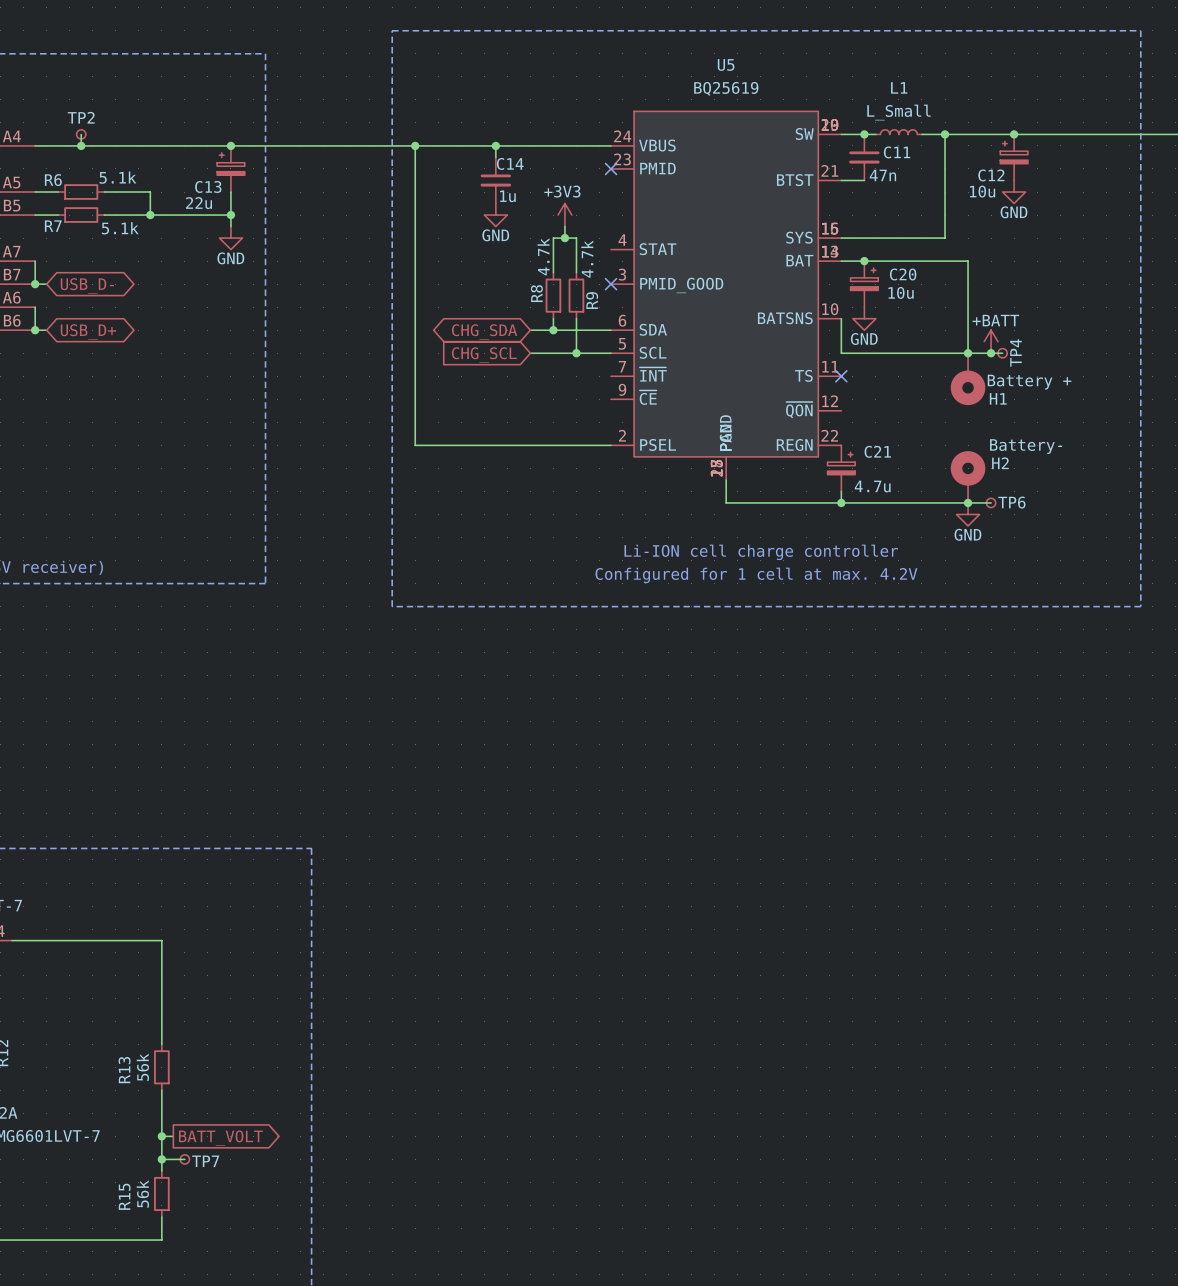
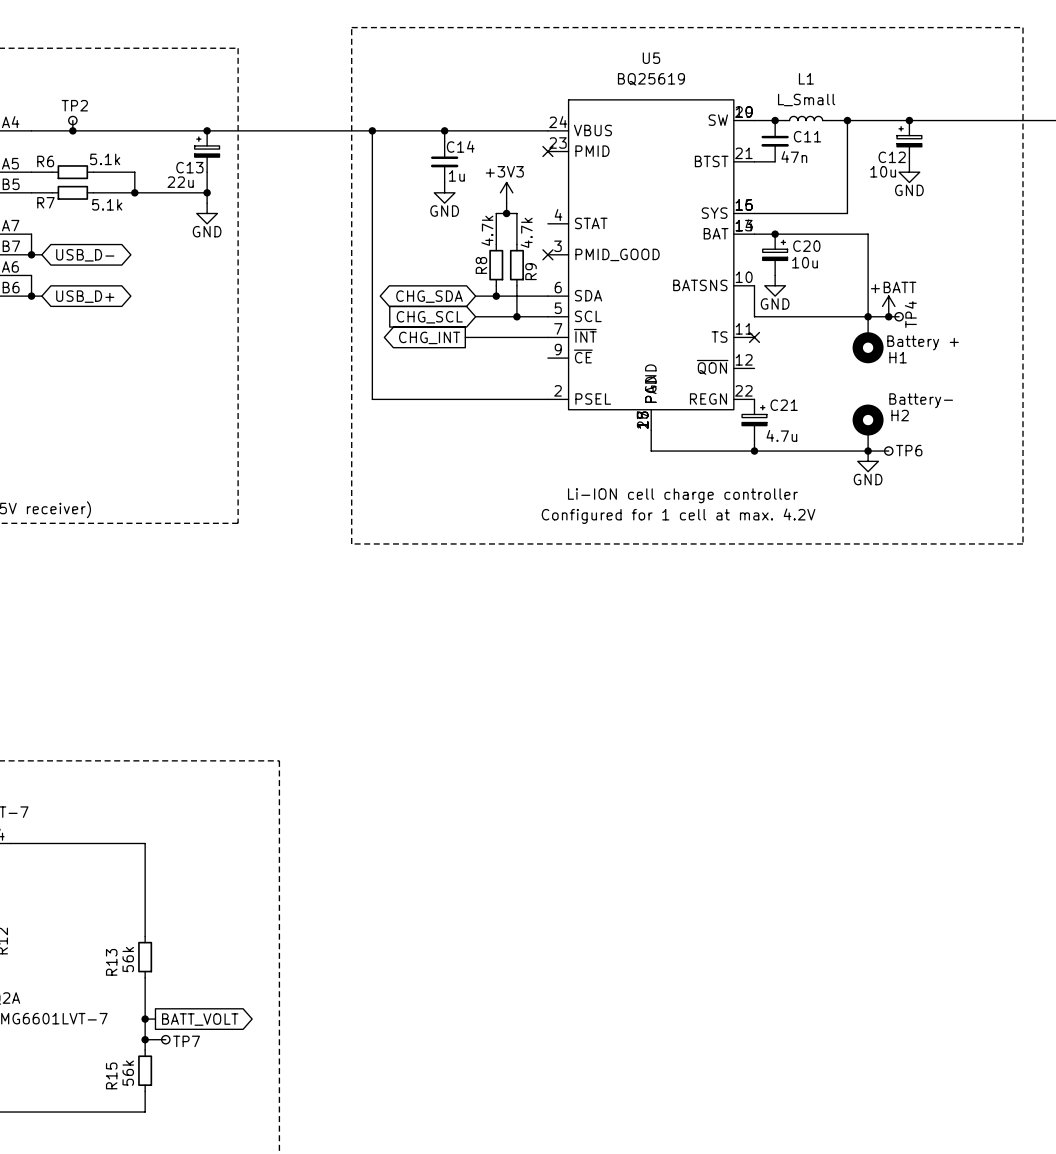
wire: none -> (465, 337) (547, 337)
global label: none -> CHG_INT (429, 337)

